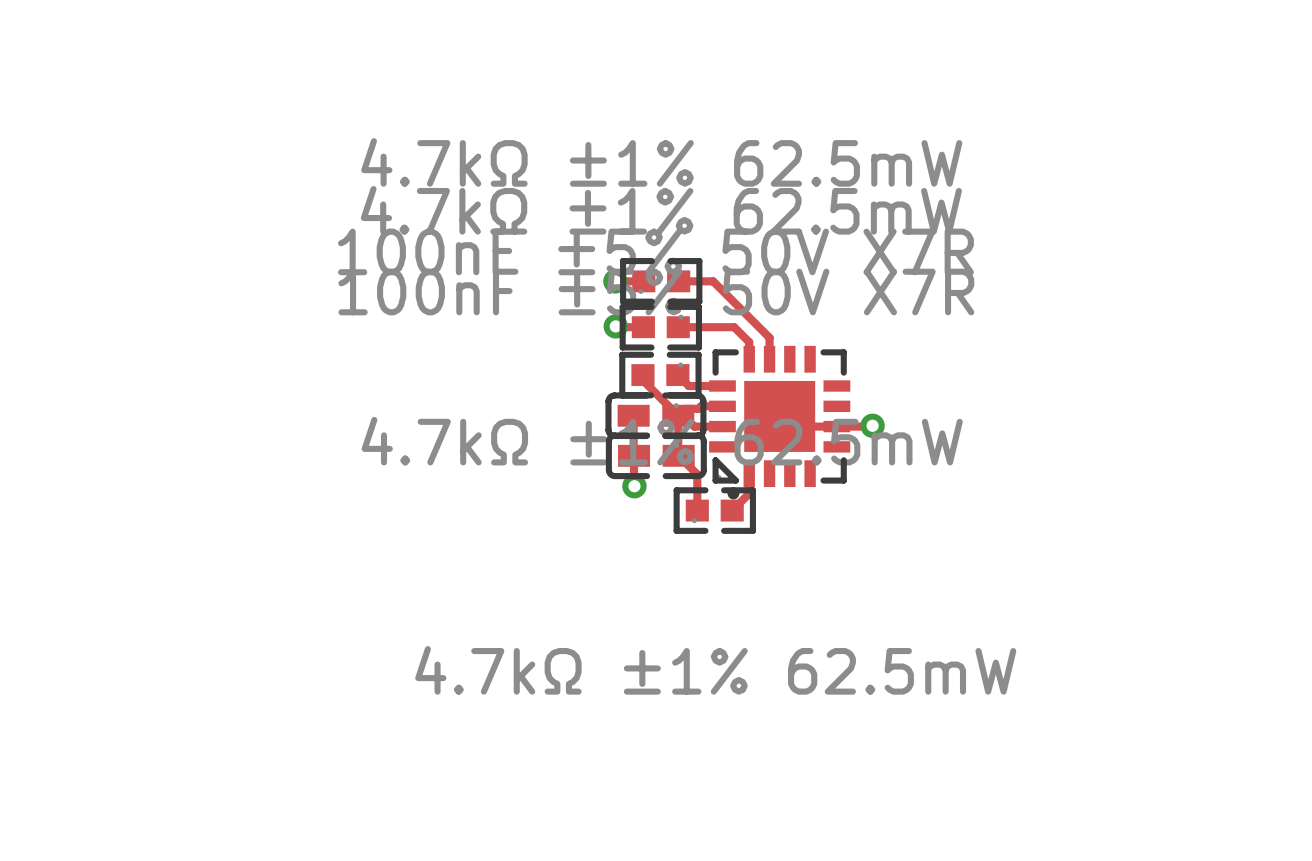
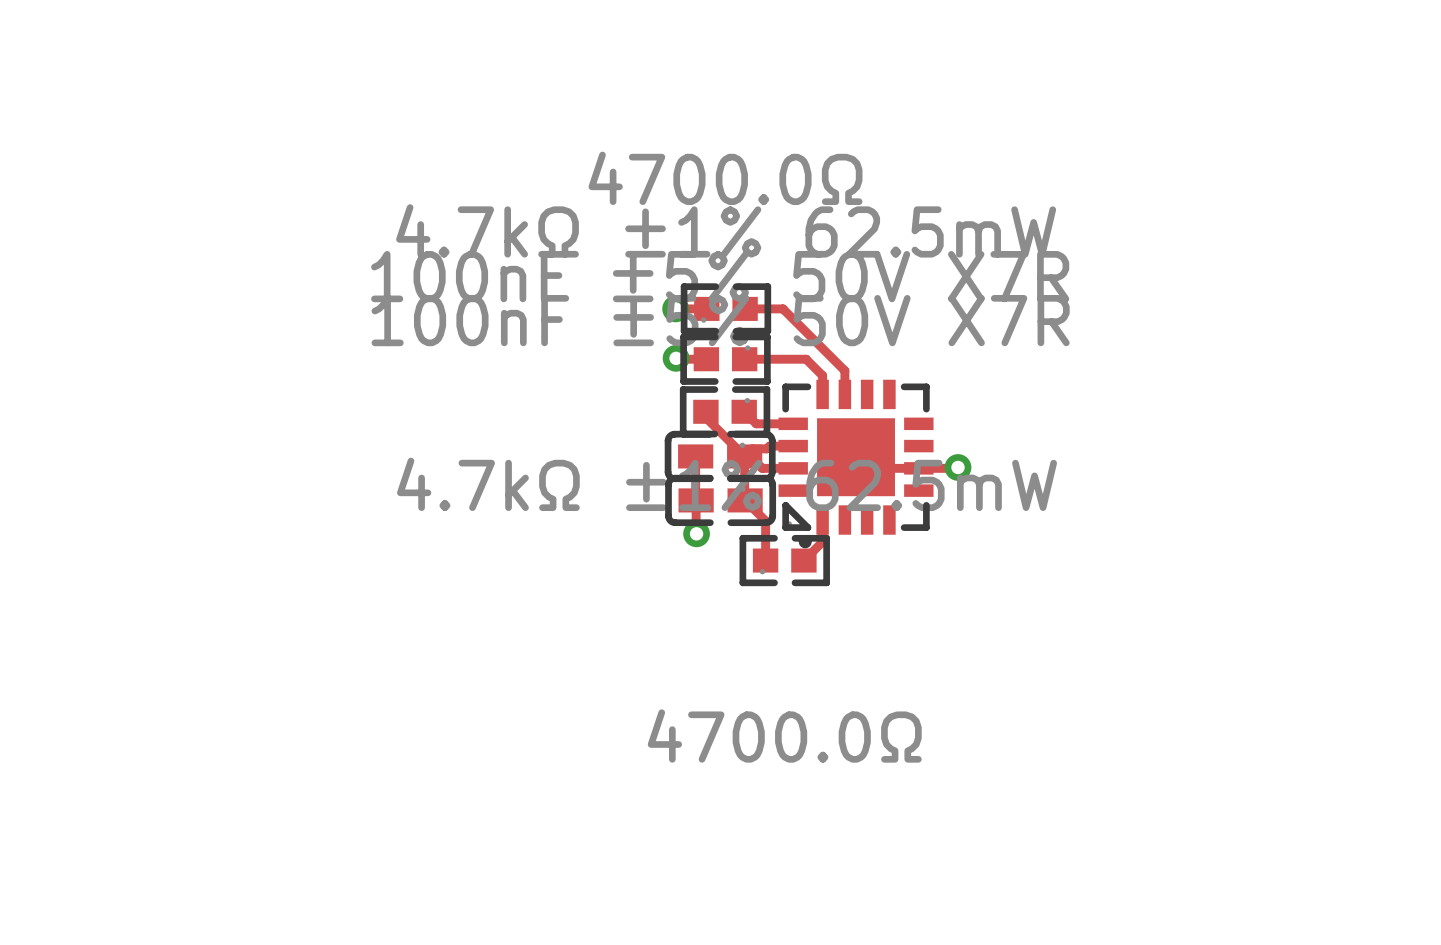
part value: 4.7kΩ ±1% 62.5mW (661, 162) -> 4700.0Ω (725, 178)
part value: 4.7kΩ ±1% 62.5mW (715, 670) -> 4700.0Ω (784, 736)

